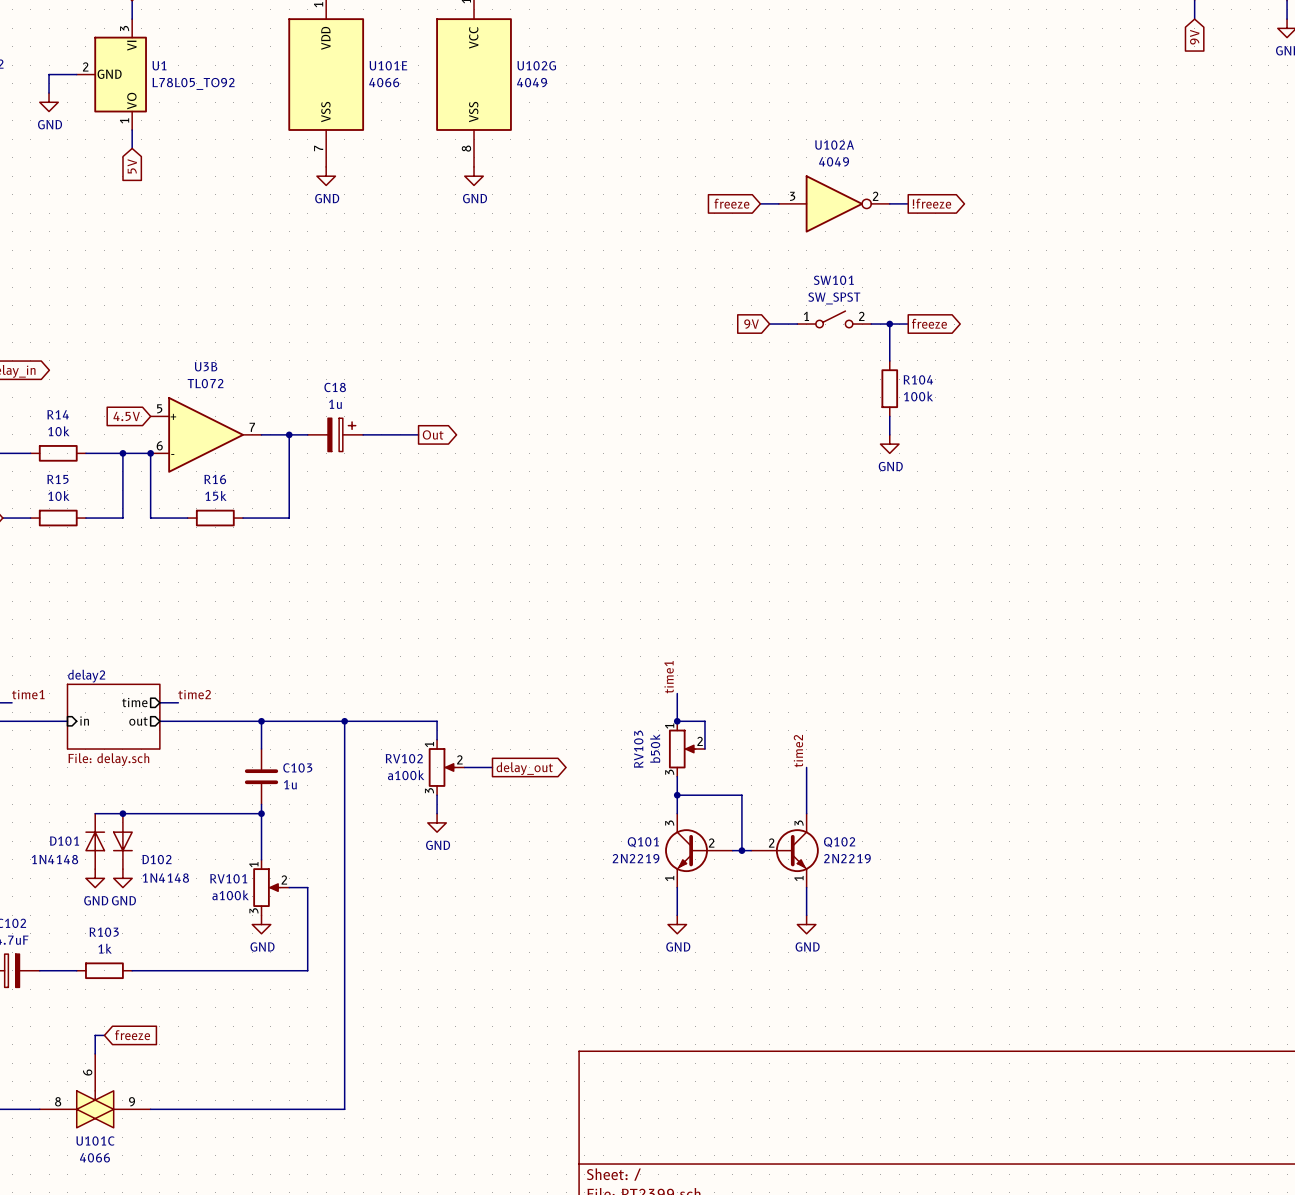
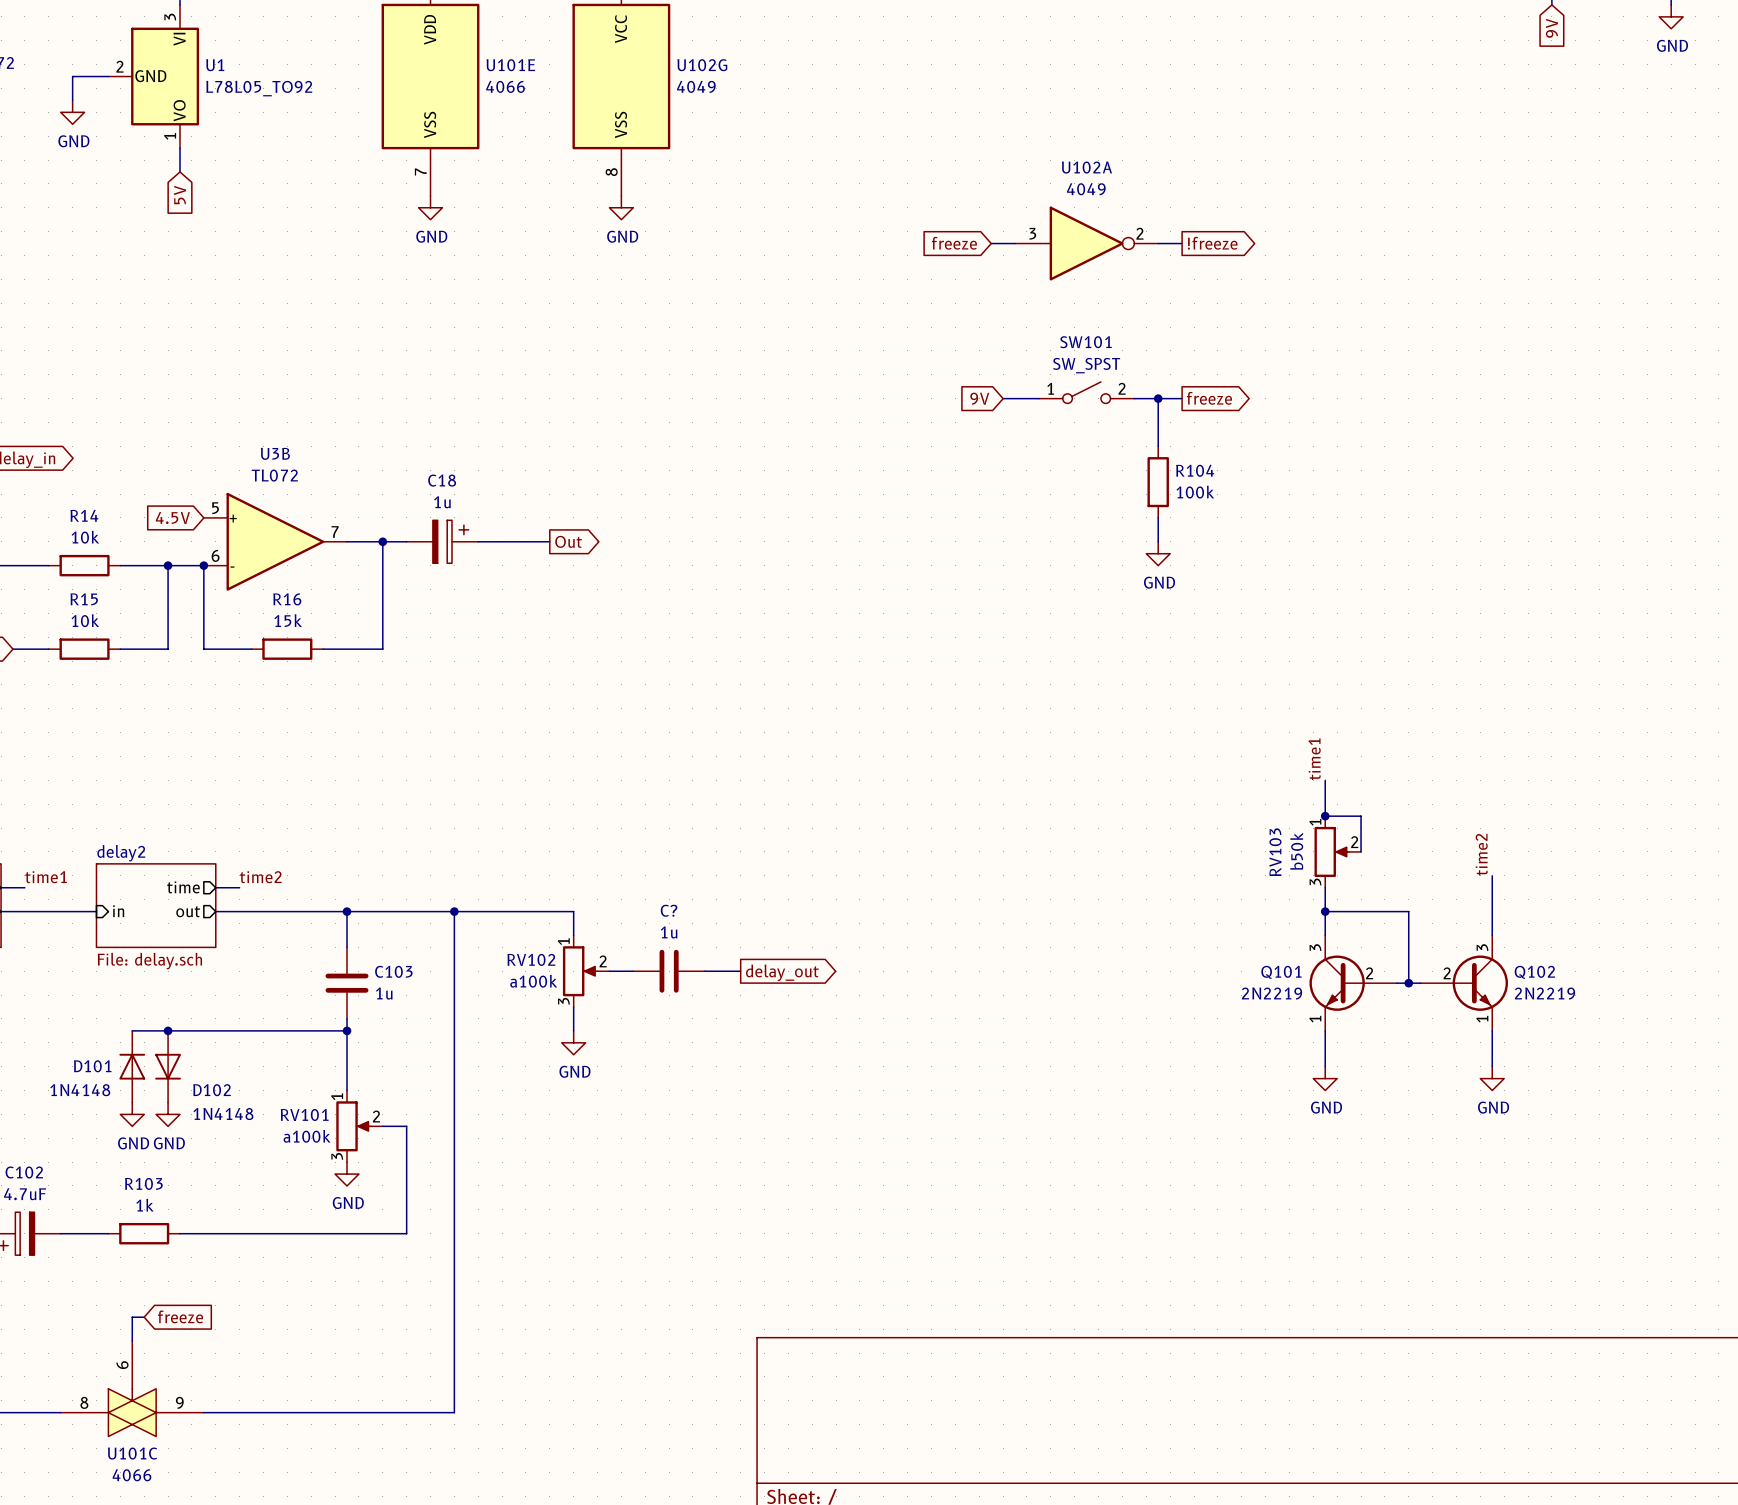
label: none -> time1 (1314, 759)
wire: none -> (1325, 780) (1325, 816) (1361, 816) (1361, 851)
junction: none -> (1325, 816)
label: time1 (669, 677) -> none
label: none -> time2 (1481, 854)
wire: (677, 693) (677, 721) (704, 721) (704, 749) -> none
wire: none -> (1492, 875) (1492, 935)
wire: none -> (1325, 887) (1325, 935)
junction: (677, 721) -> none
wire: none -> (1325, 911) (1408, 911) (1408, 983)
junction: none -> (1325, 911)
RV103 position: (686, 749) -> (1337, 851)
label: time2 (798, 751) -> none
C?: none -> 1u (669, 971)
wire: none -> (704, 971) (740, 971)
wire: (806, 767) (806, 813) -> none
global label position: delay_out (524, 768) -> delay_out (782, 972)
wire: (677, 776) (677, 813) -> none
wire: none -> (1396, 983) (1420, 983)
junction: none -> (1408, 983)
wire: (677, 795) (741, 795) (741, 850) -> none
junction: (677, 795) -> none
wire: none -> (1325, 1030) (1325, 1066)
wire: none -> (1492, 1030) (1492, 1066)
Q101 position: (698, 850) -> (1353, 983)
wire: (732, 850) (751, 850) -> none
junction: (741, 850) -> none
Q102 position: (784, 850) -> (1464, 983)
power symbol: none -> GND (1325, 1078)
power symbol: none -> GND (1492, 1078)
wire: (677, 887) (677, 915) -> none
wire: (806, 887) (806, 915) -> none
power symbol: GND (677, 924) -> none
power symbol: GND (806, 924) -> none

